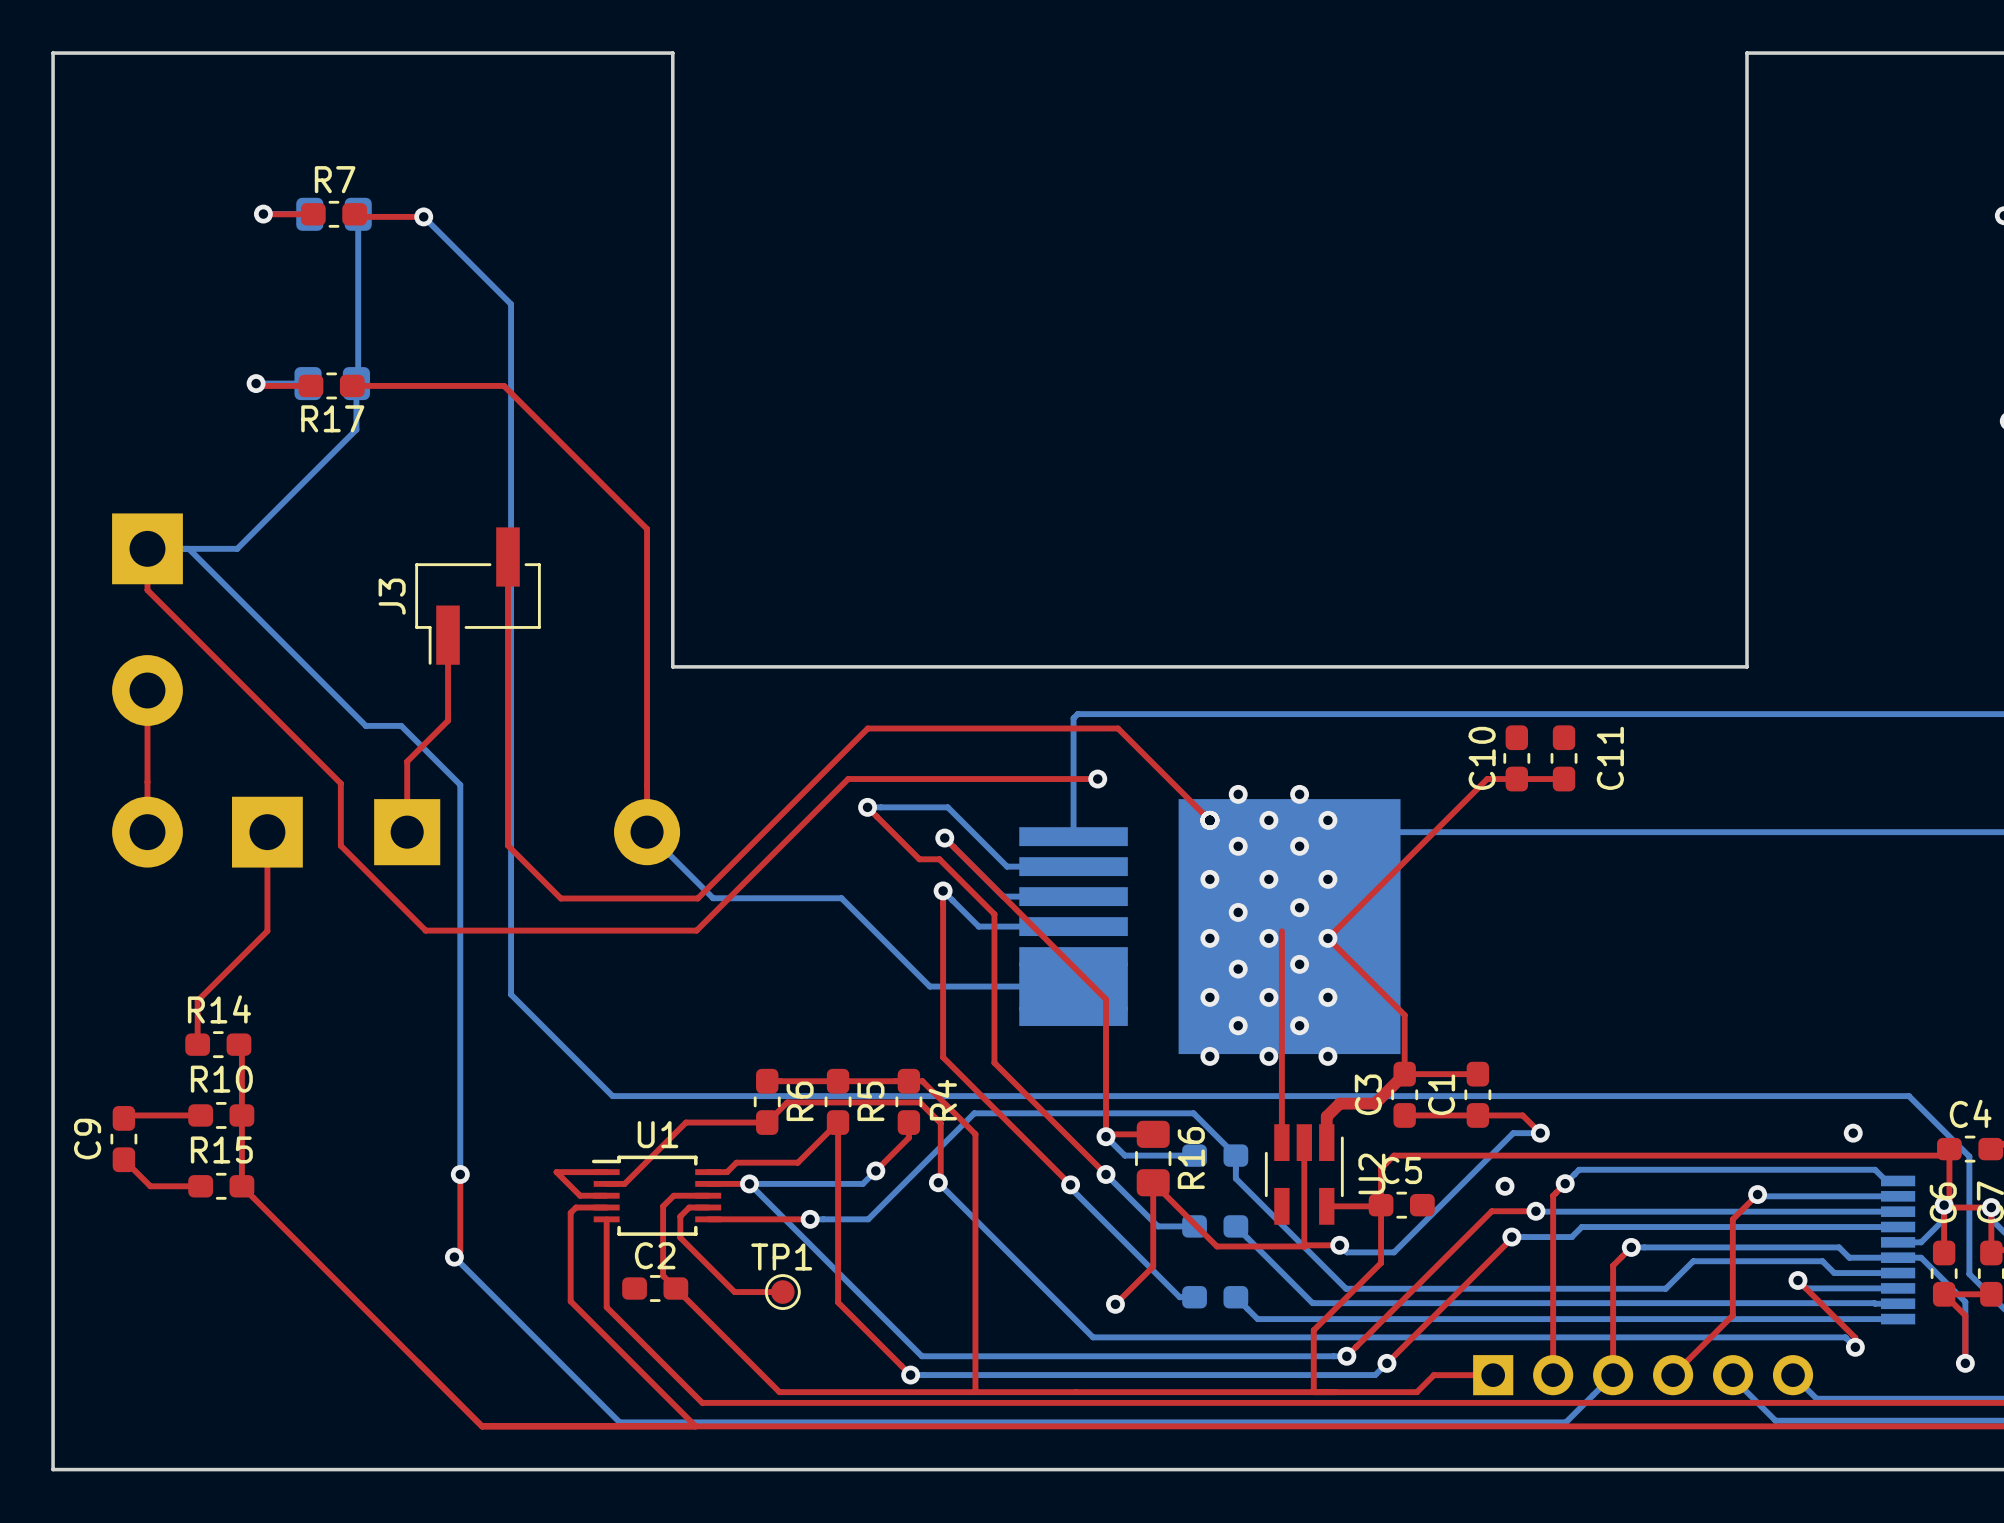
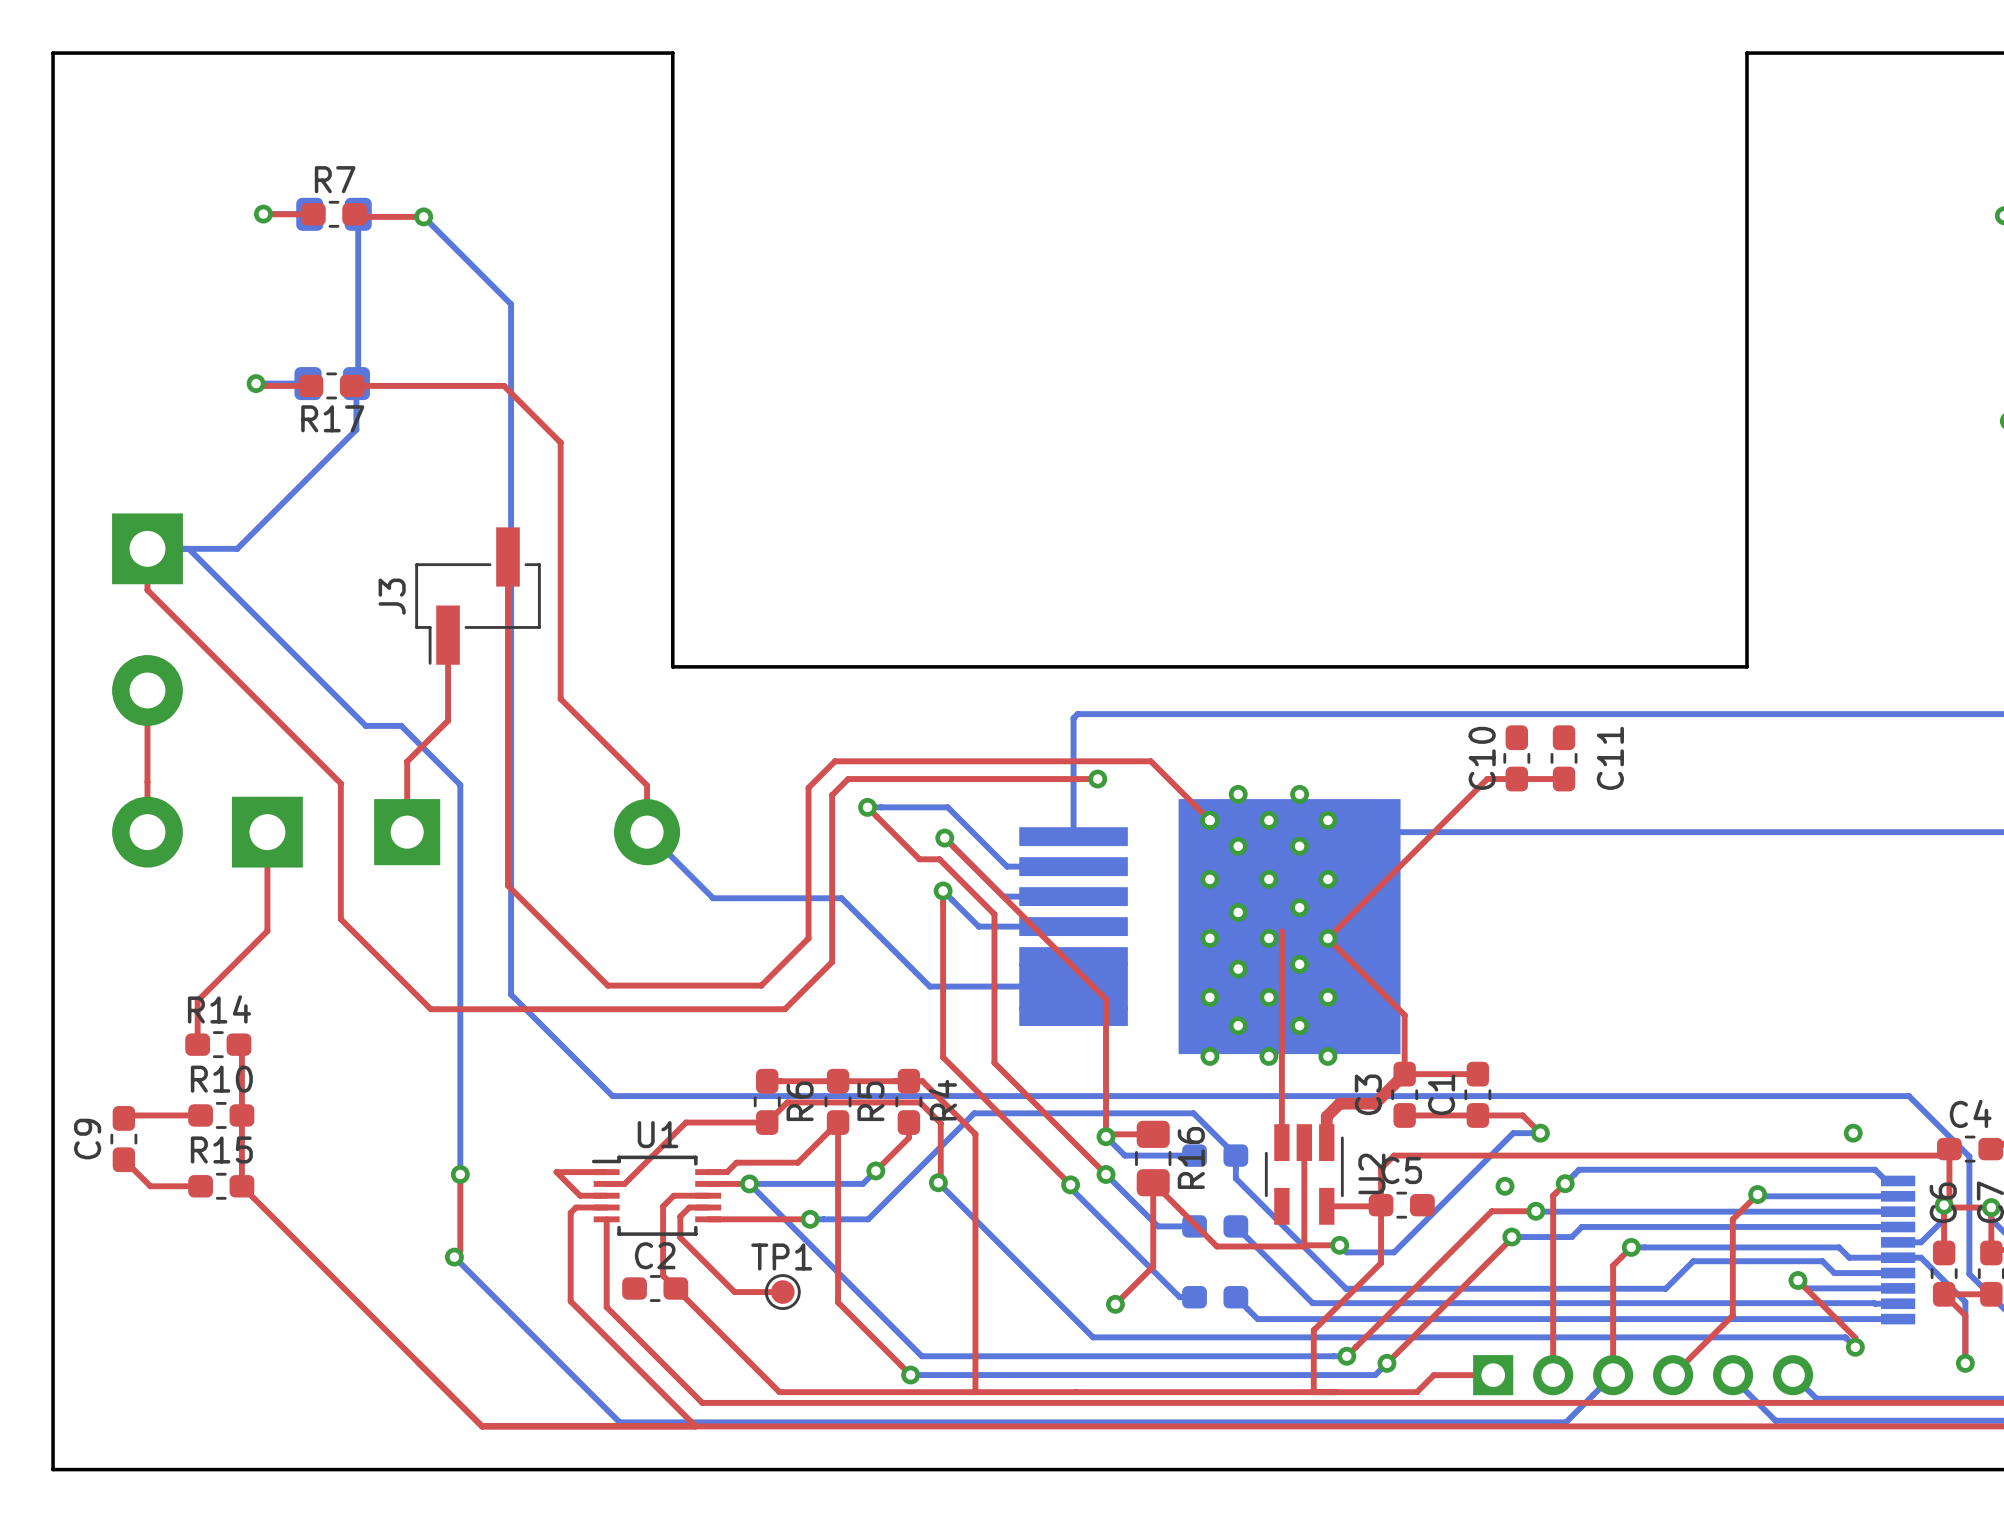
top track: (560, 442) (647, 529) (647, 785) -> (560, 442) (560, 699) (647, 785)
top track: (834, 761) (867, 728) (1118, 728) (1150, 761) -> (834, 761) (1150, 761)
top track: (808, 787) (697, 898) (560, 898) (508, 845) -> (808, 787) (808, 938) (761, 985) (607, 985) (508, 885) (508, 845)
top track: (832, 795) (696, 930) (425, 930) (340, 845) -> (832, 795) (832, 962) (784, 1009) (430, 1009) (340, 919) (340, 845)

